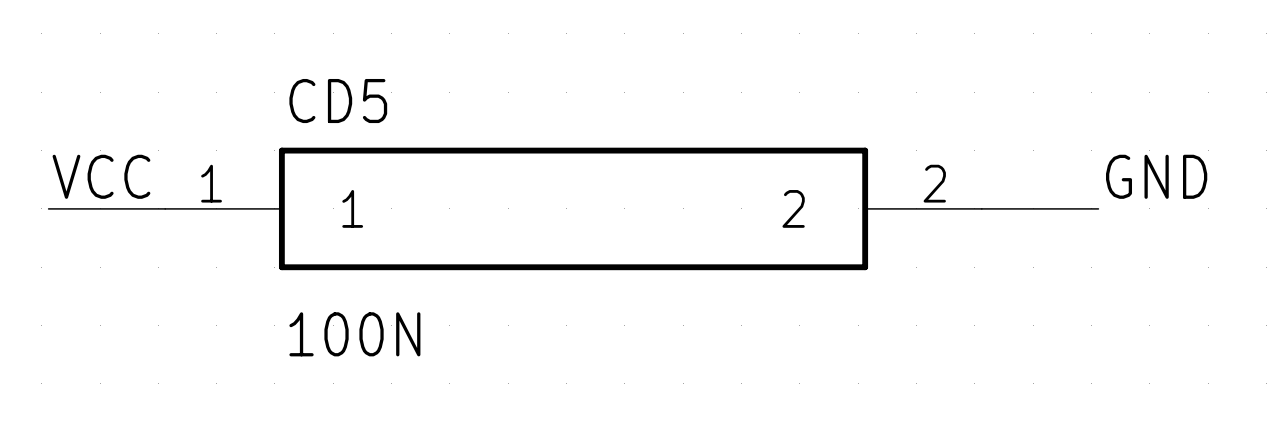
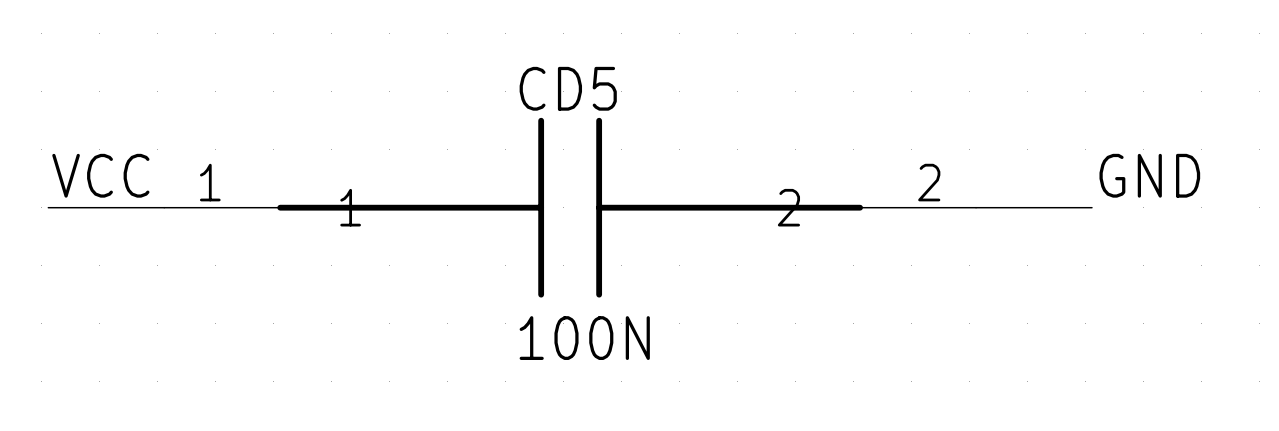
CD5 name position: CD5 (338, 101) -> CD5 (568, 88)
CD5 symbol: [165, 147, 982, 271] -> [164, 117, 977, 298]
CD5 value position: 100N (354, 334) -> 100N (584, 338)

